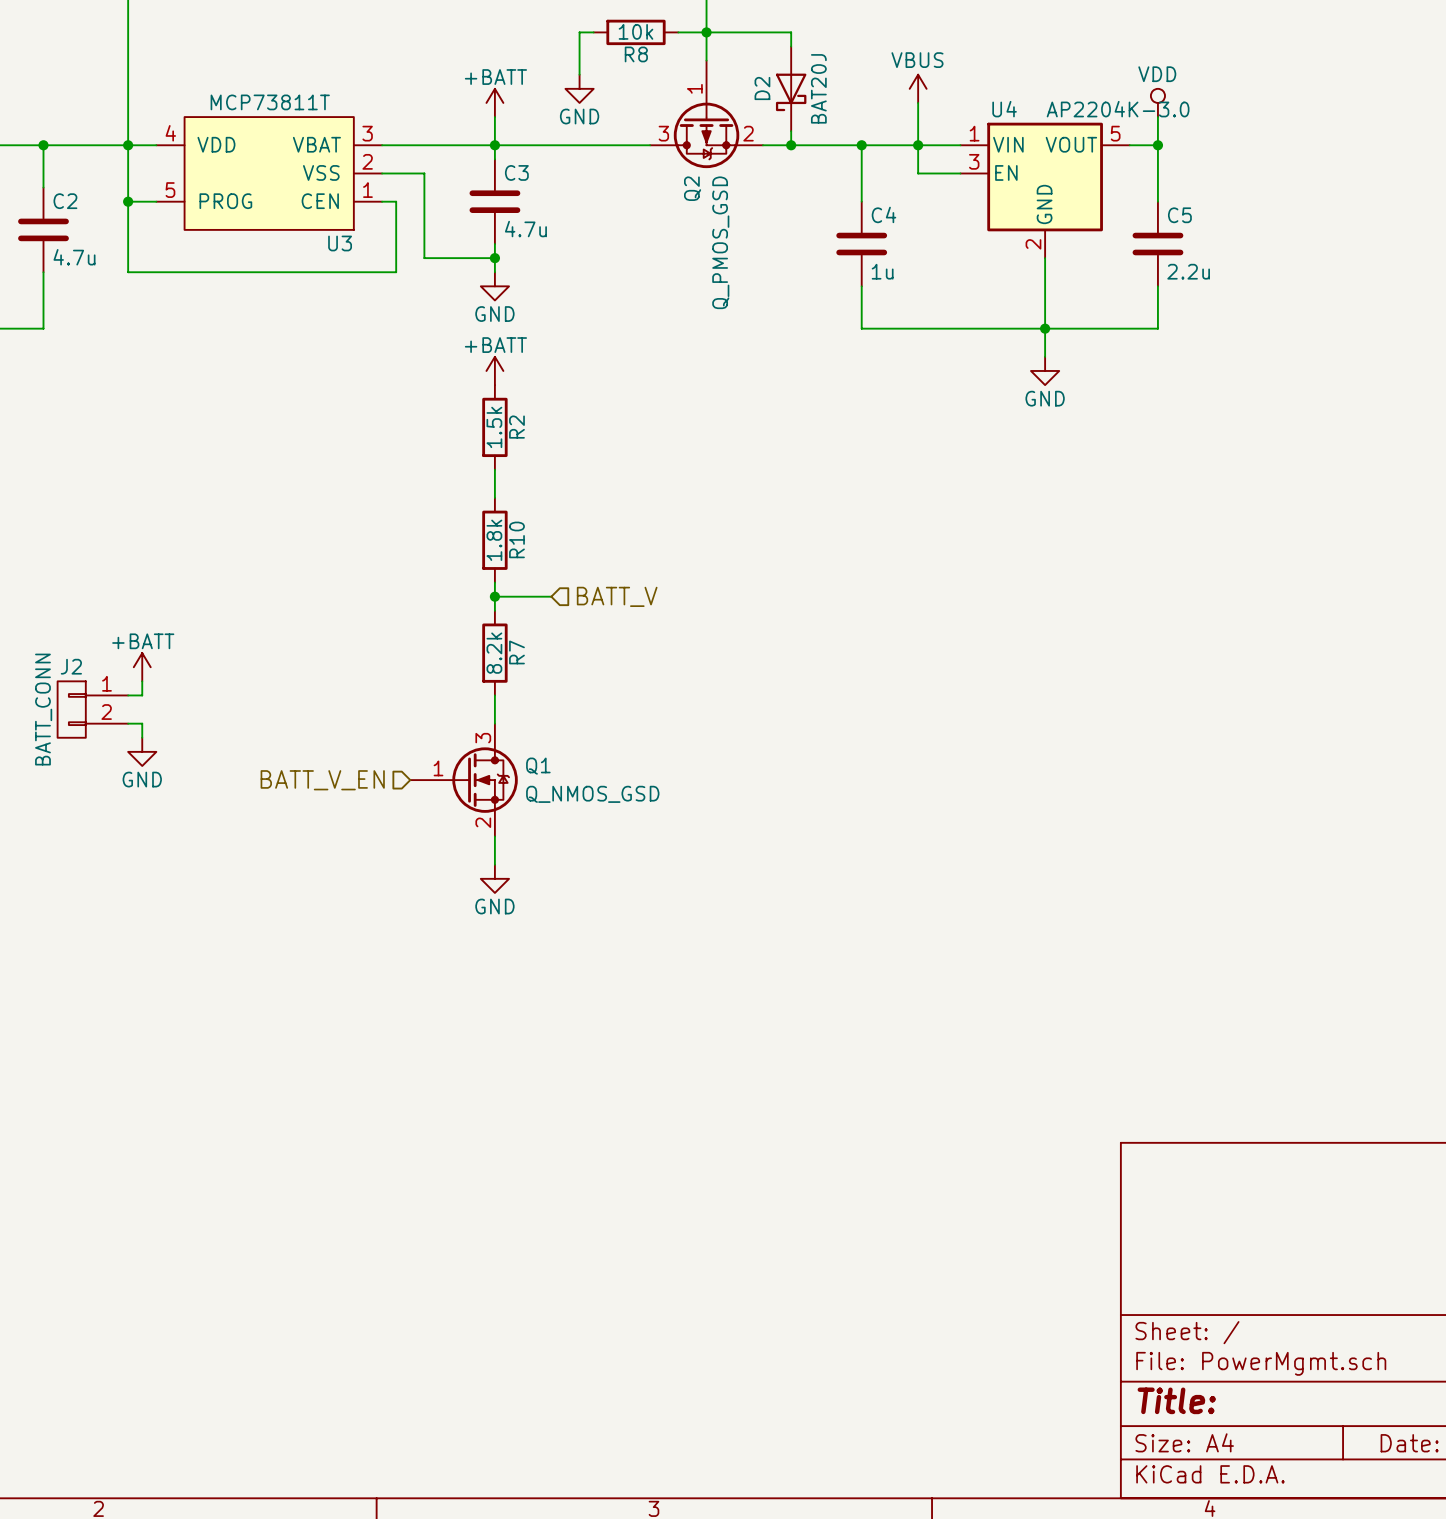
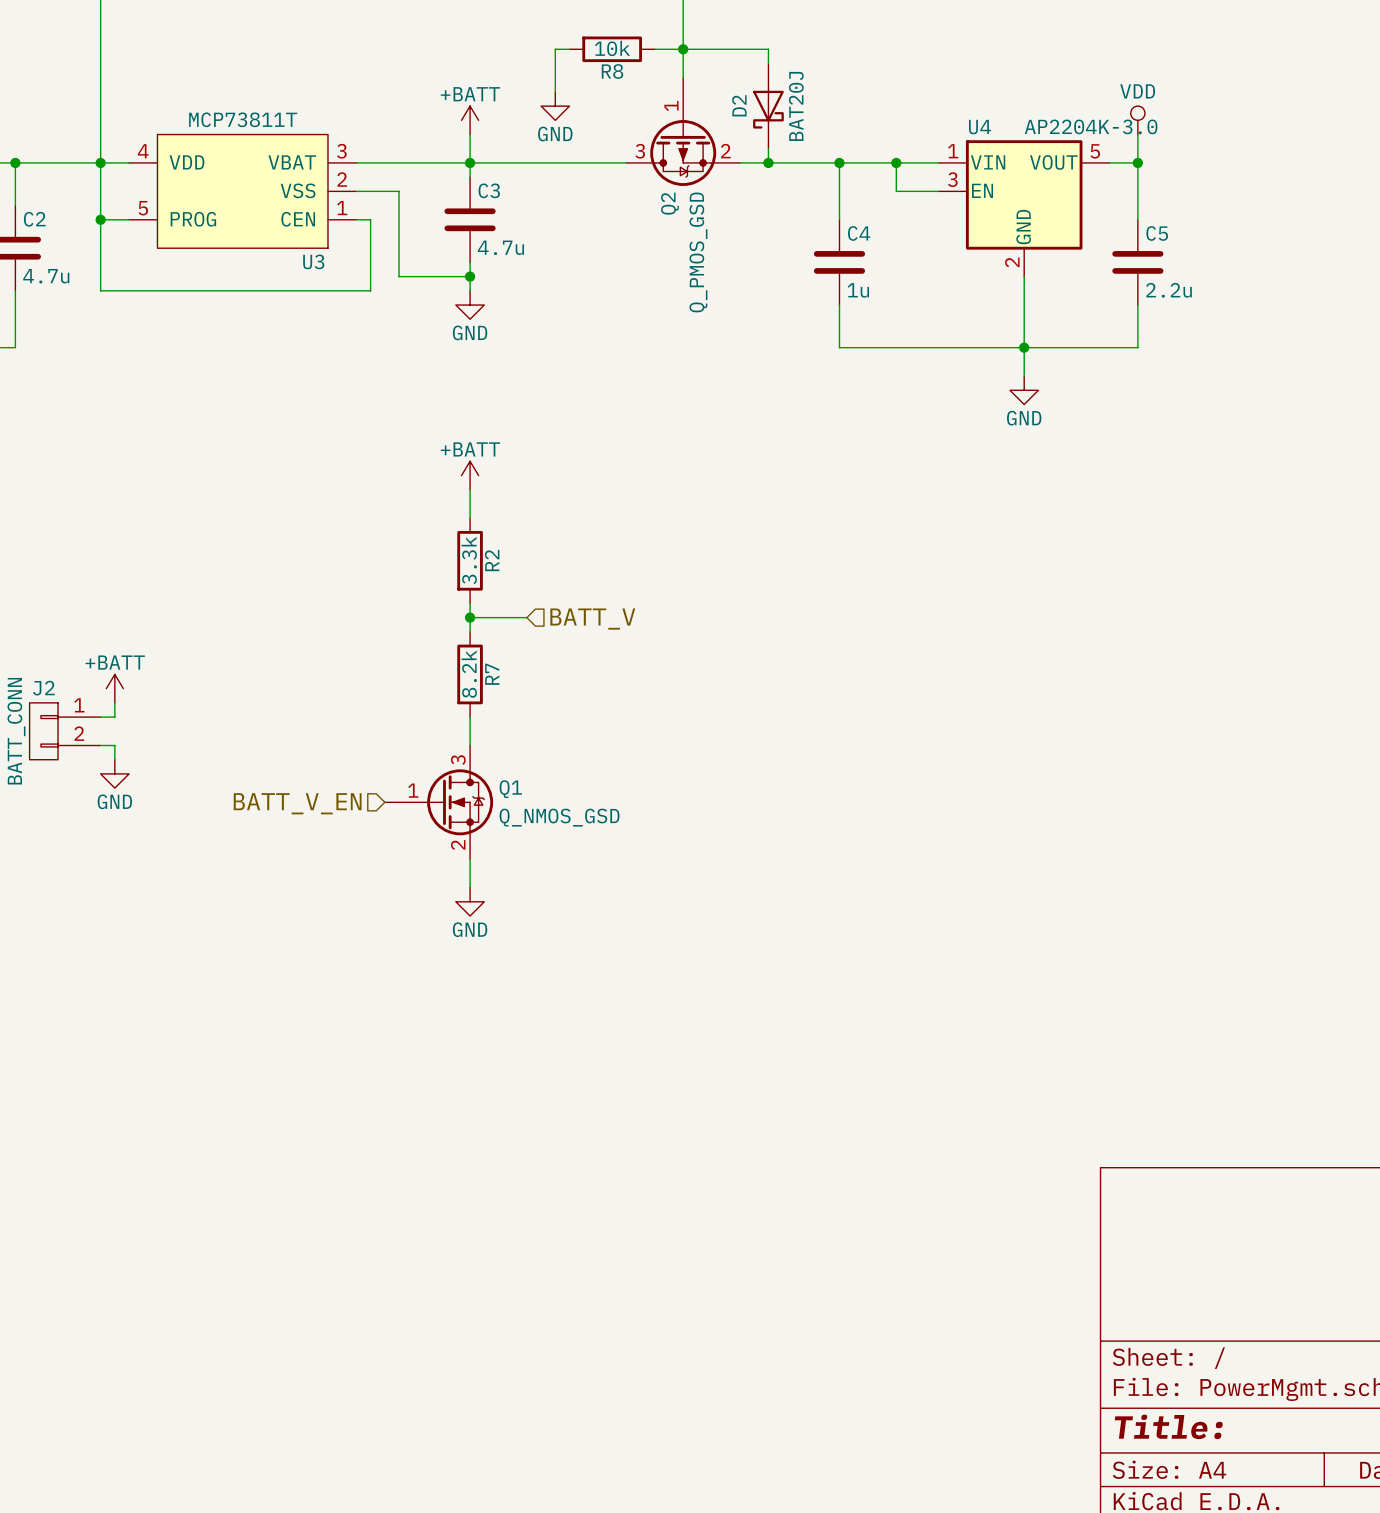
power symbol: VBUS (918, 88) -> none
wire: (918, 102) (918, 145) -> none
power symbol position: +BATT (494, 370) -> +BATT (470, 475)
R2: 1.5k (494, 427) -> none
R10 name: R10 (516, 539) -> R2 (492, 560)
R10 value: 1.8k (494, 540) -> 3.3k (469, 560)

